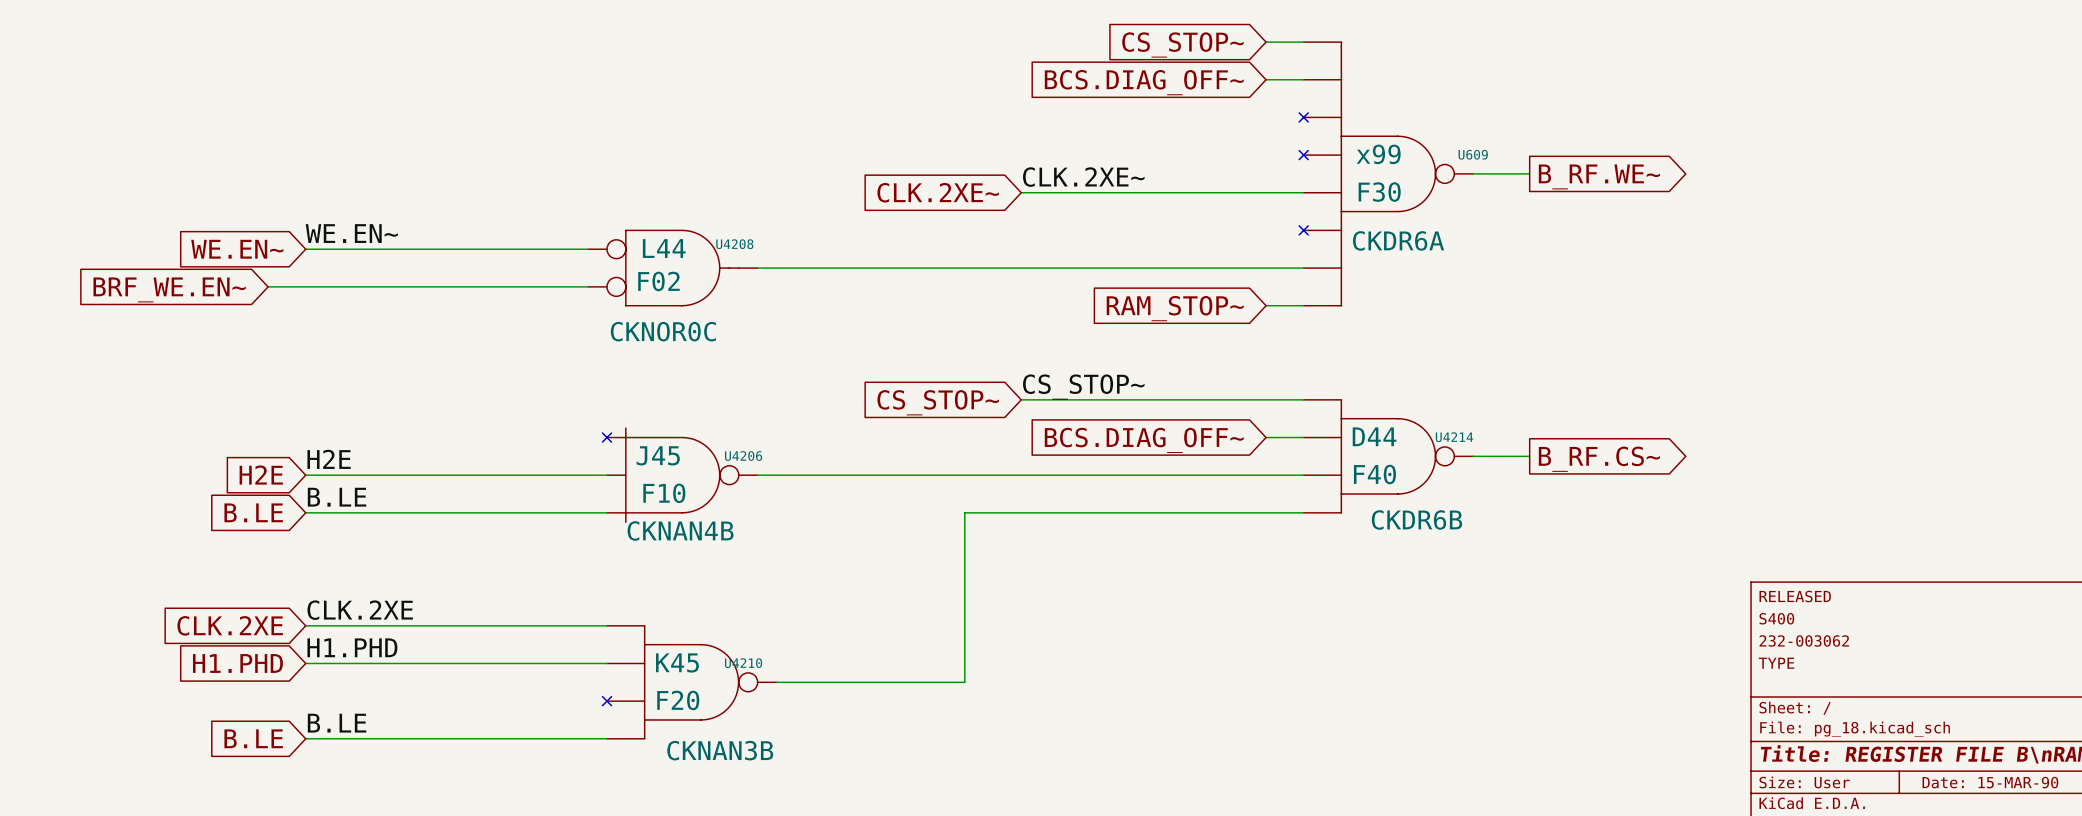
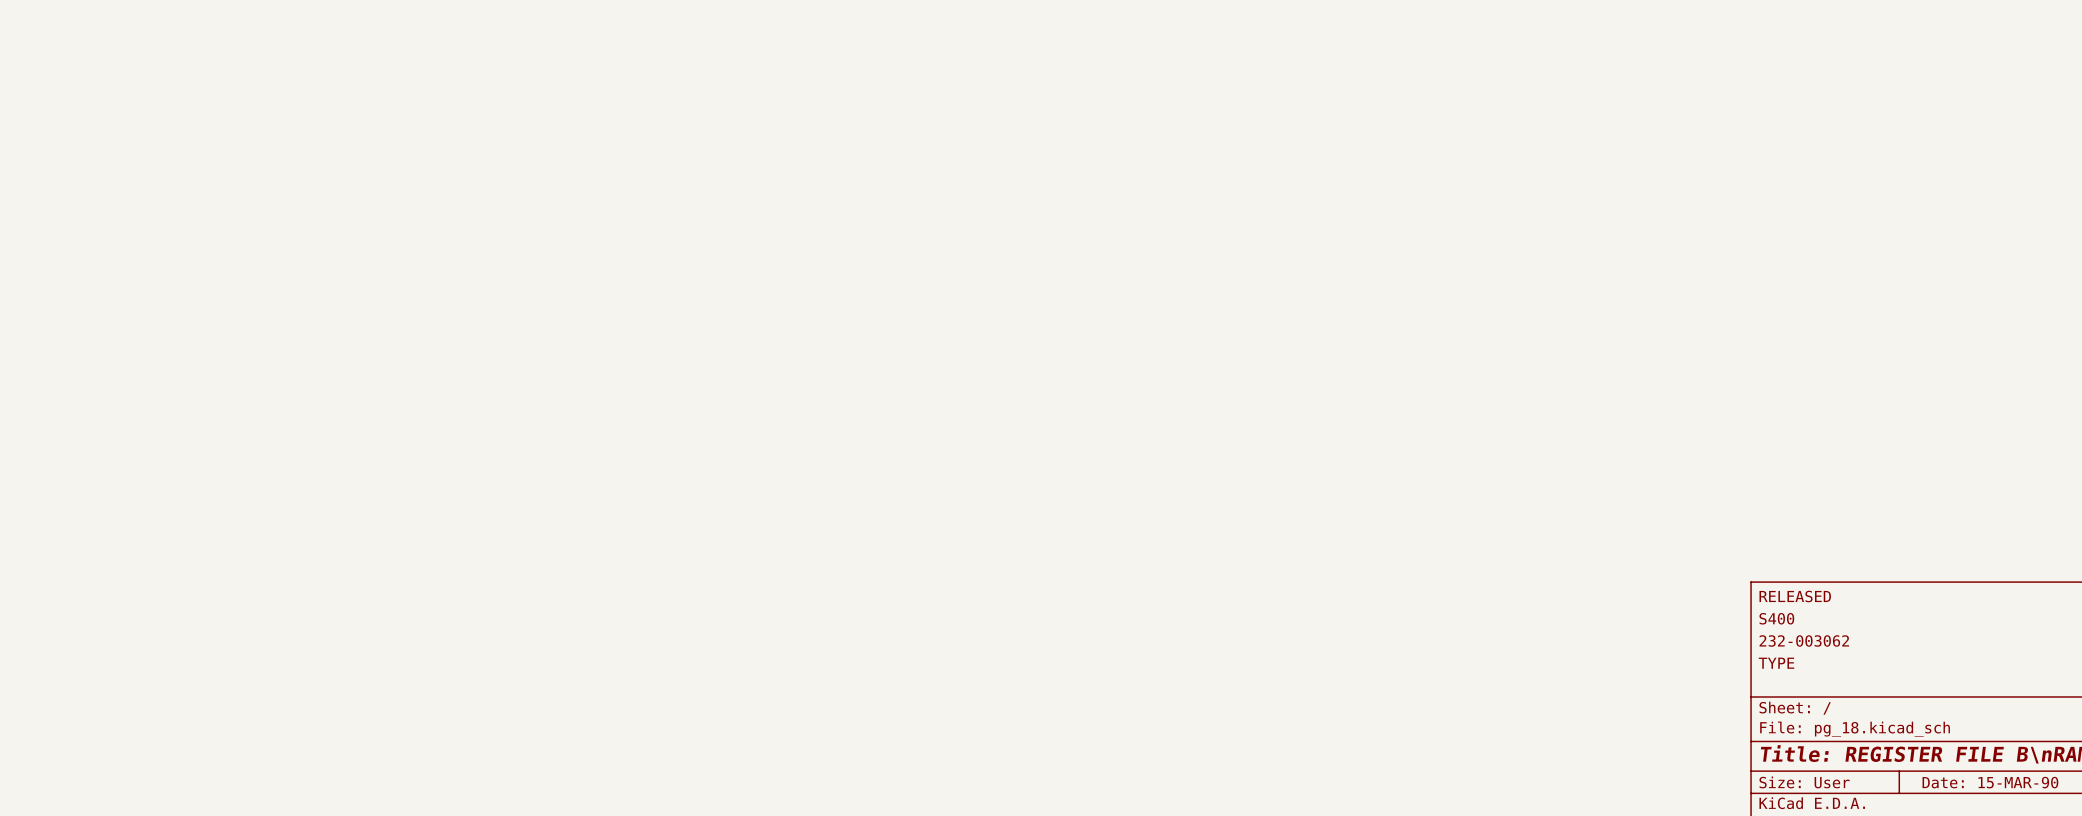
wire: (1266, 42) (1303, 42) -> none
global label: CS_STOP~ (1182, 44) -> none
wire: (1266, 79) (1303, 79) -> none
global label: BCS.DIAG_OFF~ (1144, 82) -> none
no-connect mark: (1303, 117) -> none
no-connect mark: (1303, 155) -> none
U609: F30 (1388, 173) -> none
wire: (1473, 173) (1529, 173) -> none
global label: B_RF.WE~ (1599, 176) -> none
label: CLK.2XE~ (1083, 177) -> none
global label: CLK.2XE~ (938, 192) -> none
wire: (1021, 192) (1303, 192) -> none
no-connect mark: (1303, 230) -> none
label: WE.EN~ (351, 233) -> none
global label: WE.EN~ (237, 249) -> none
wire: (305, 249) (588, 249) -> none
U4208: F02 (672, 268) -> none
wire: (757, 268) (1303, 268) -> none
wire: (268, 286) (588, 286) -> none
global label: BRF_WE.EN~ (169, 289) -> none
wire: (1266, 305) (1303, 305) -> none
global label: RAM_STOP~ (1175, 308) -> none
label: CS_STOP~ (1083, 387) -> none
wire: (1021, 399) (1303, 399) -> none
global label: CS_STOP~ (938, 402) -> none
no-connect mark: (607, 437) -> none
wire: (1266, 437) (1303, 437) -> none
global label: BCS.DIAG_OFF~ (1144, 440) -> none
U4214: F40 (1388, 456) -> none
wire: (1473, 456) (1529, 456) -> none
label: H2E (329, 459) -> none
global label: B_RF.CS~ (1599, 459) -> none
global label: H2E (261, 475) -> none
wire: (305, 475) (607, 475) -> none
U4206: F10 (682, 475) -> none
wire: (757, 475) (1303, 475) -> none
label: B.LE (337, 497) -> none
global label: B.LE (253, 512) -> none
wire: (305, 512) (607, 512) -> none
wire: (1303, 512) (964, 512) (964, 682) (776, 682) -> none
label: CLK.2XE (360, 610) -> none
global label: CLK.2XE (230, 625) -> none
wire: (305, 625) (607, 625) -> none
label: H1.PHD (352, 647) -> none
global label: H1.PHD (237, 663) -> none
wire: (305, 663) (607, 663) -> none
U4210: F20 (691, 682) -> none
no-connect mark: (607, 701) -> none
label: B.LE (337, 723) -> none
global label: B.LE (253, 738) -> none
wire: (305, 738) (607, 738) -> none

